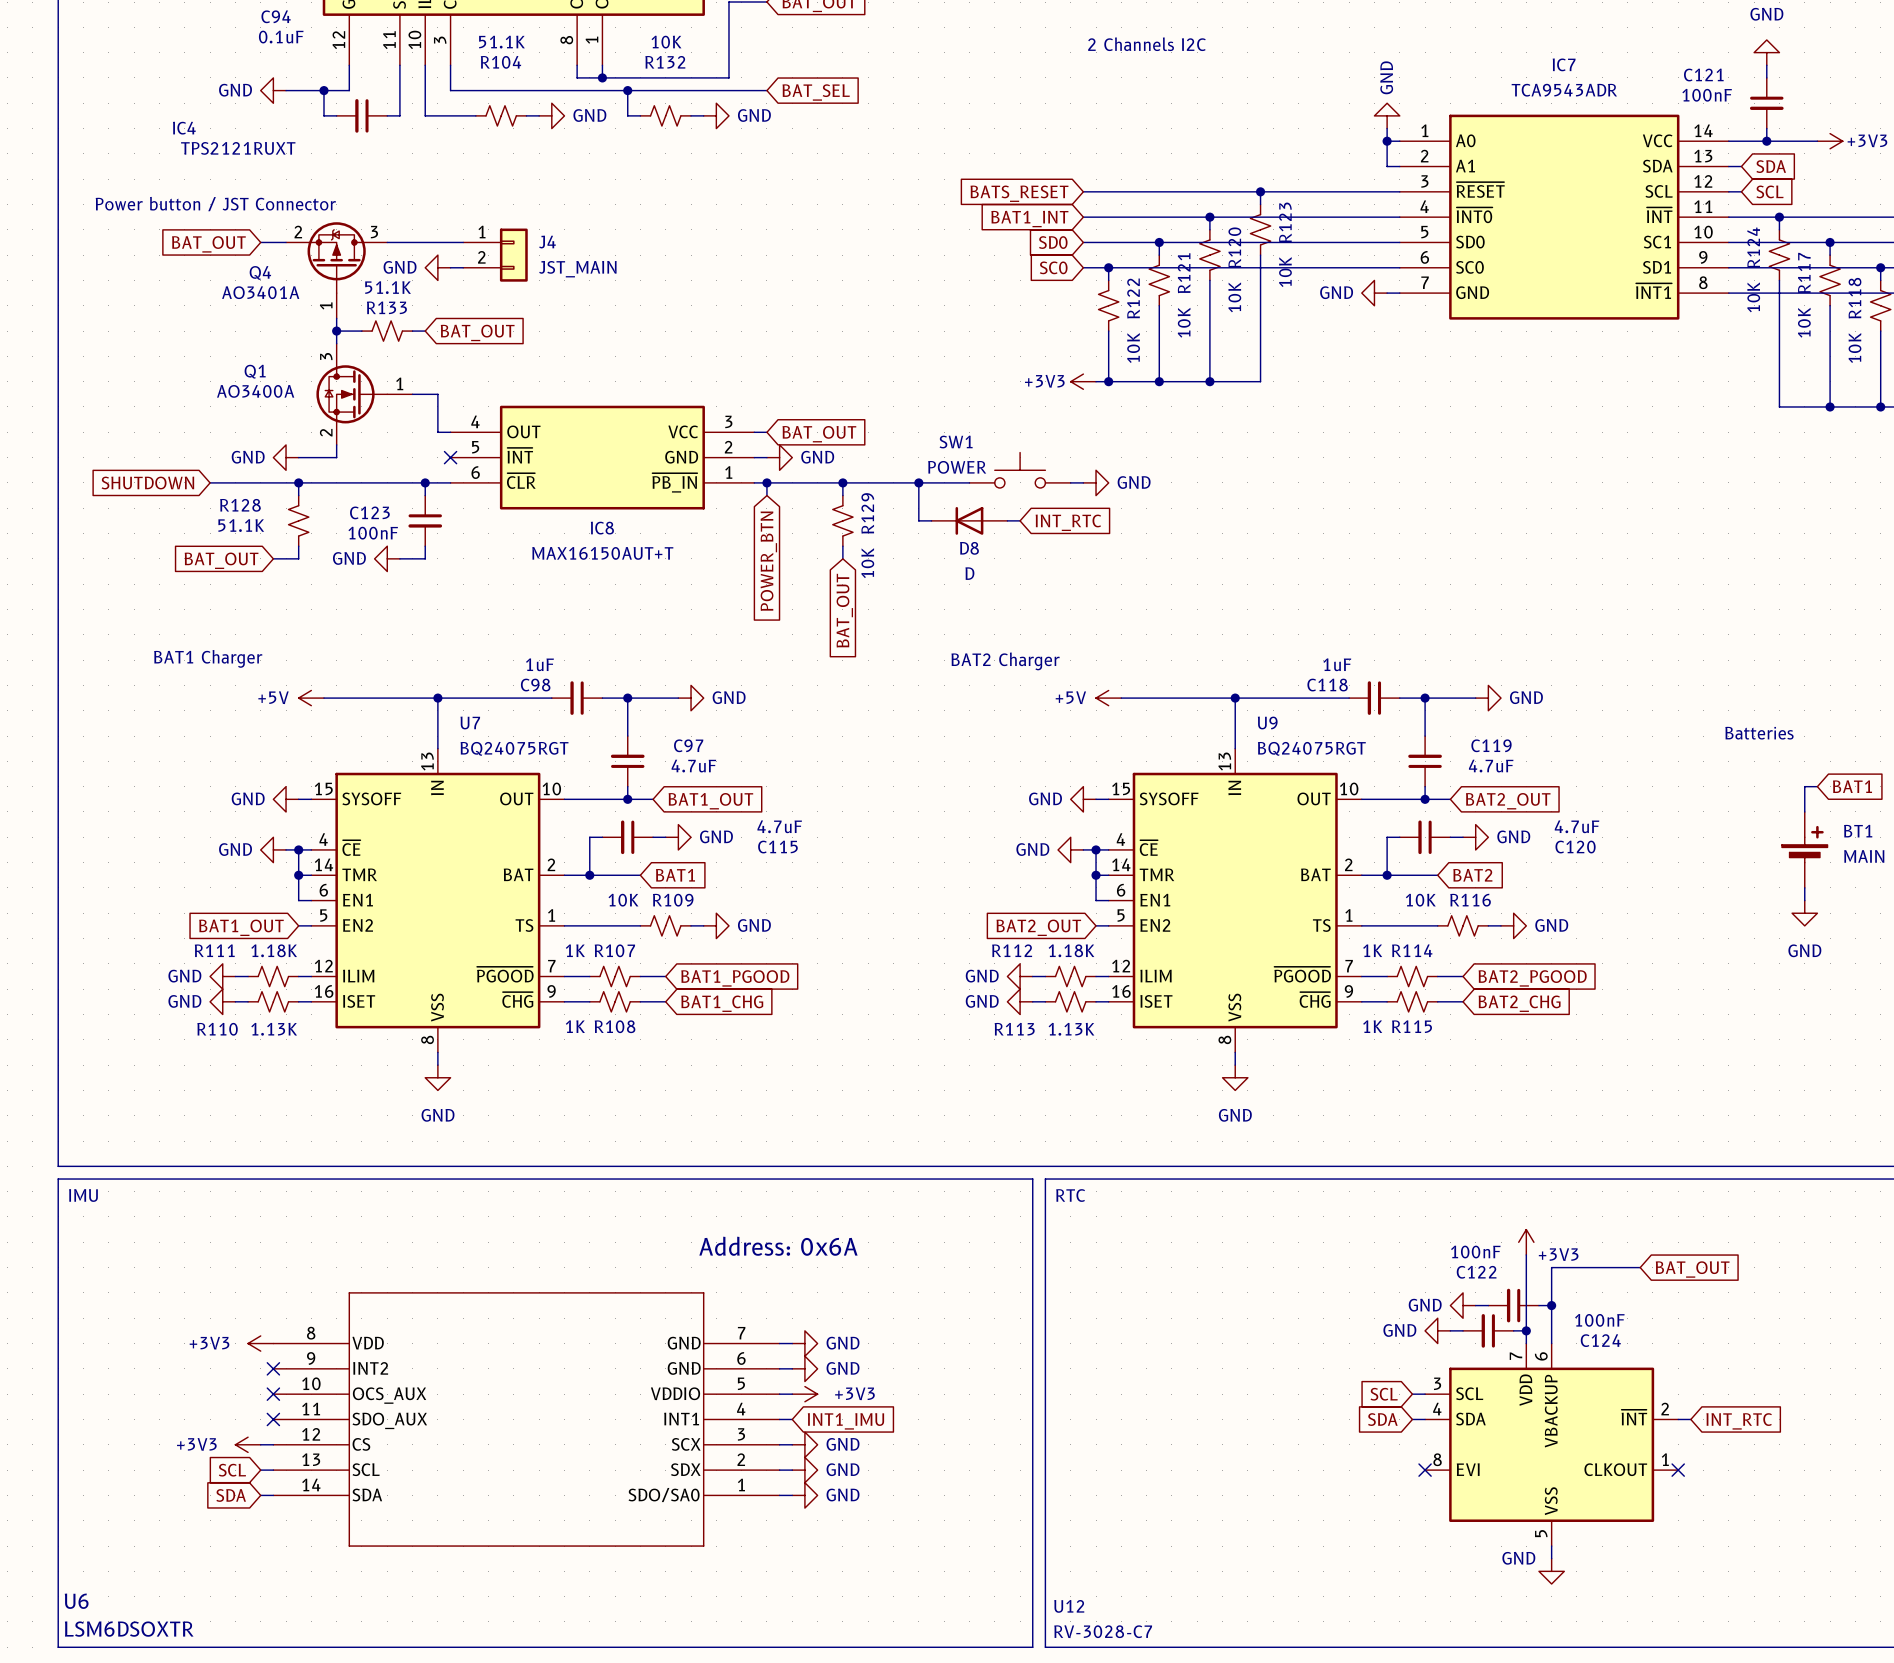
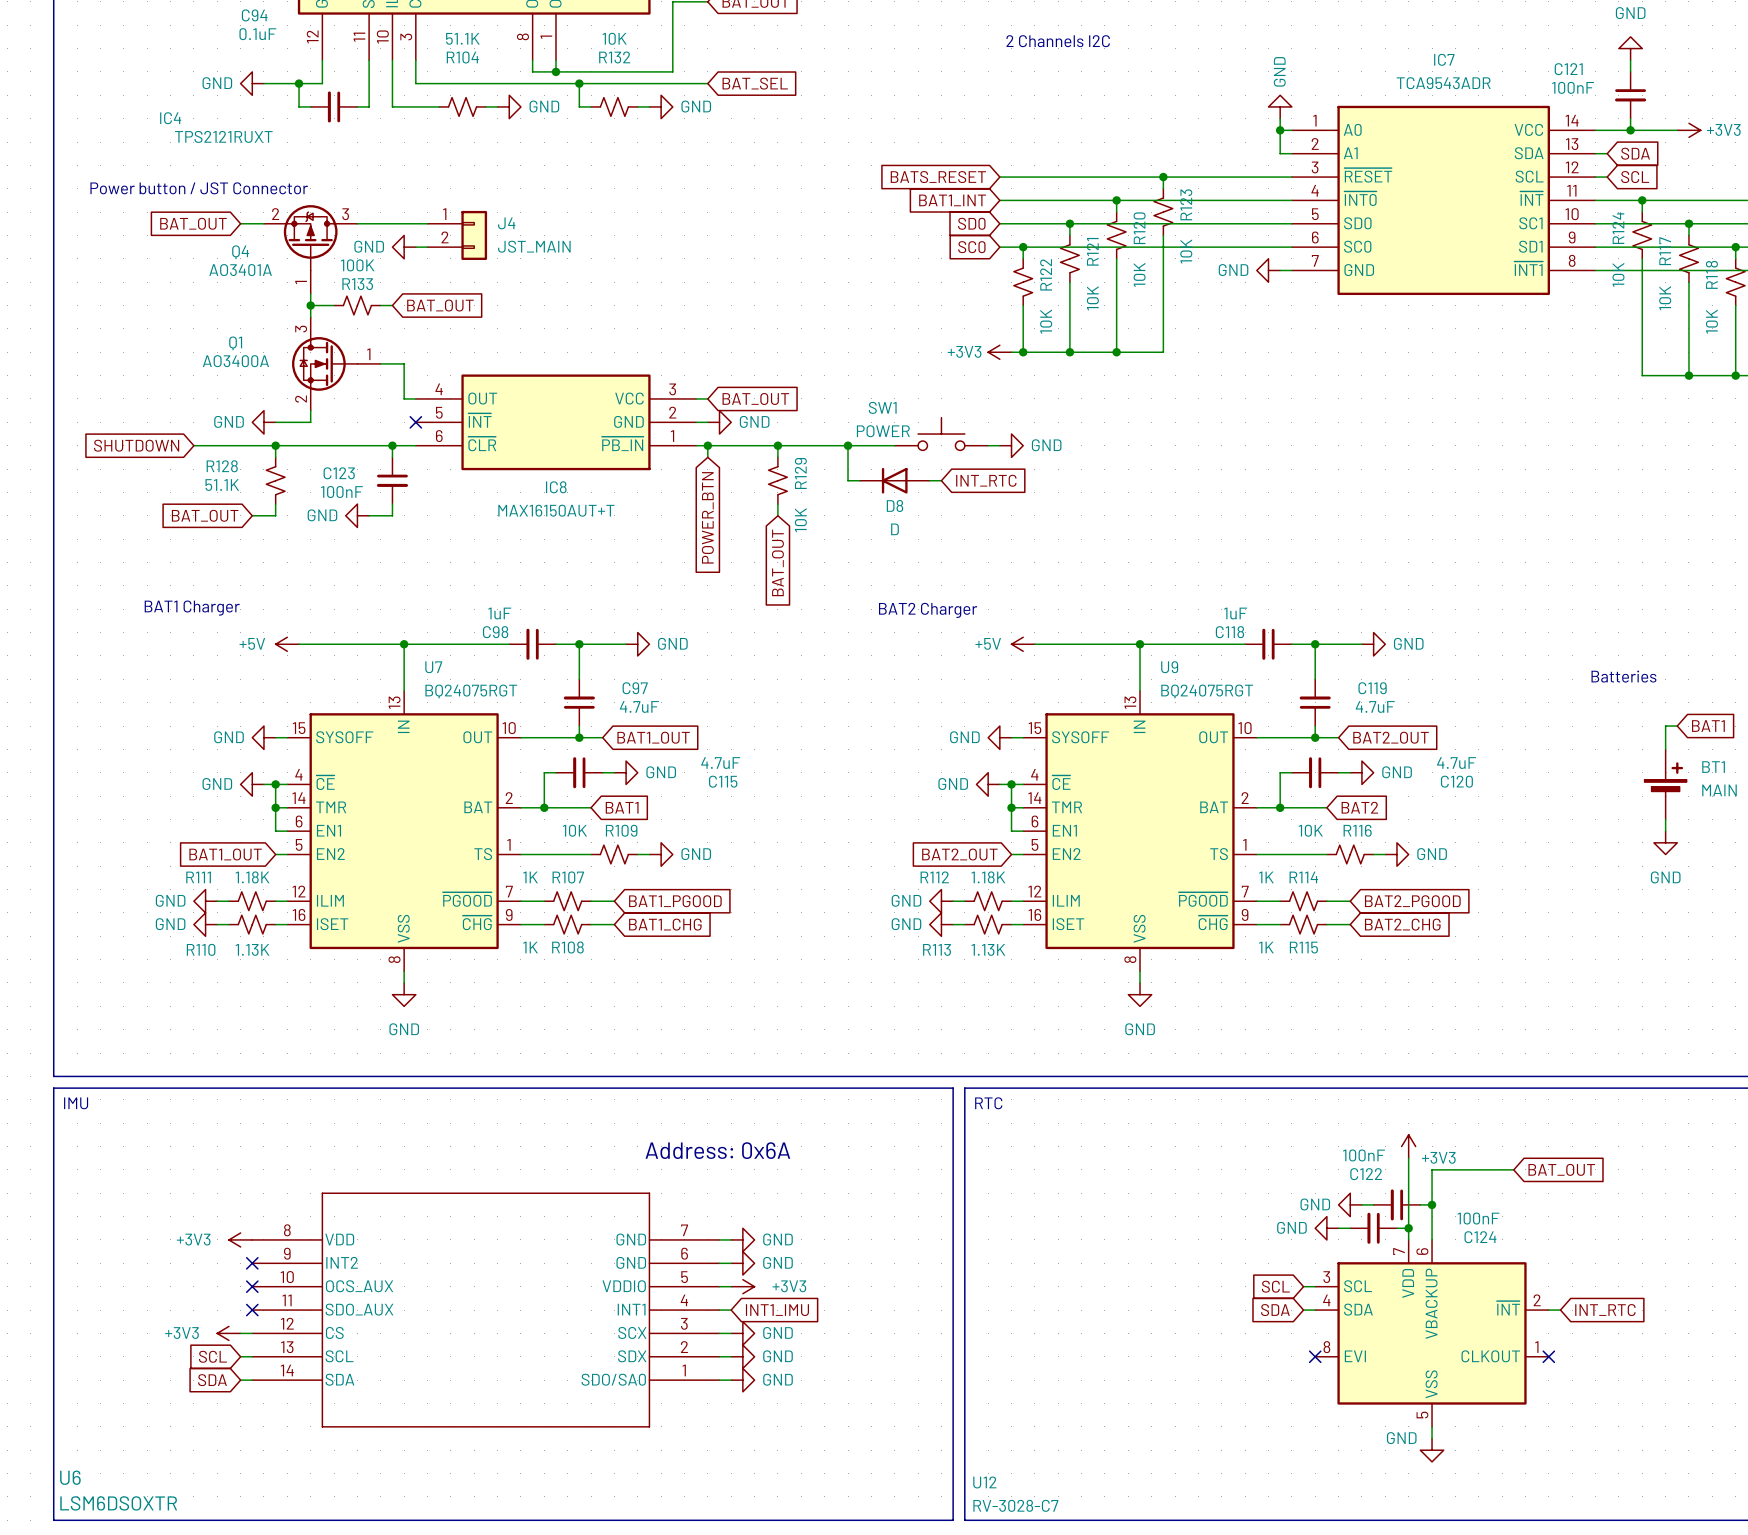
R133 value: 51.1K (388, 287) -> 100K (357, 265)

